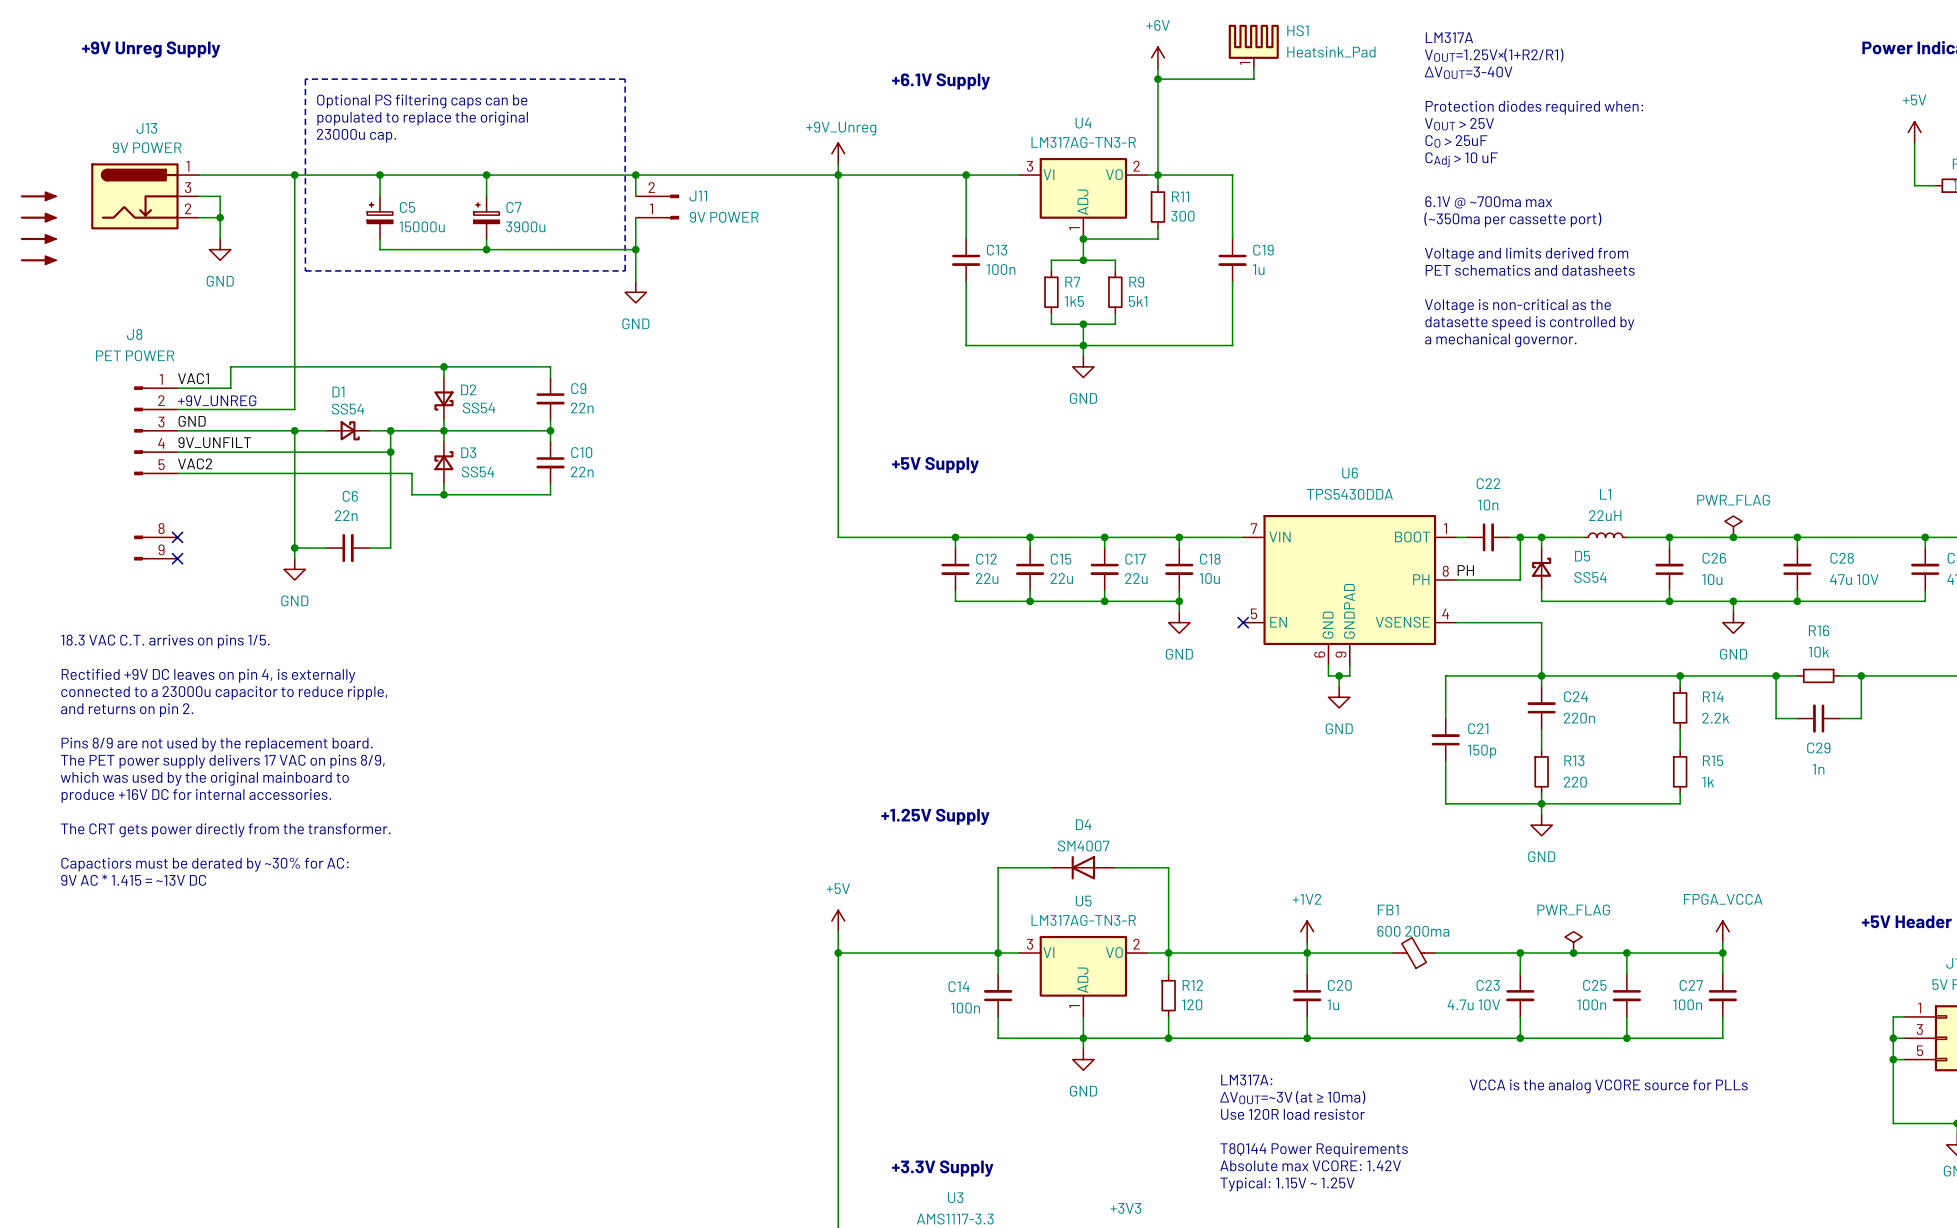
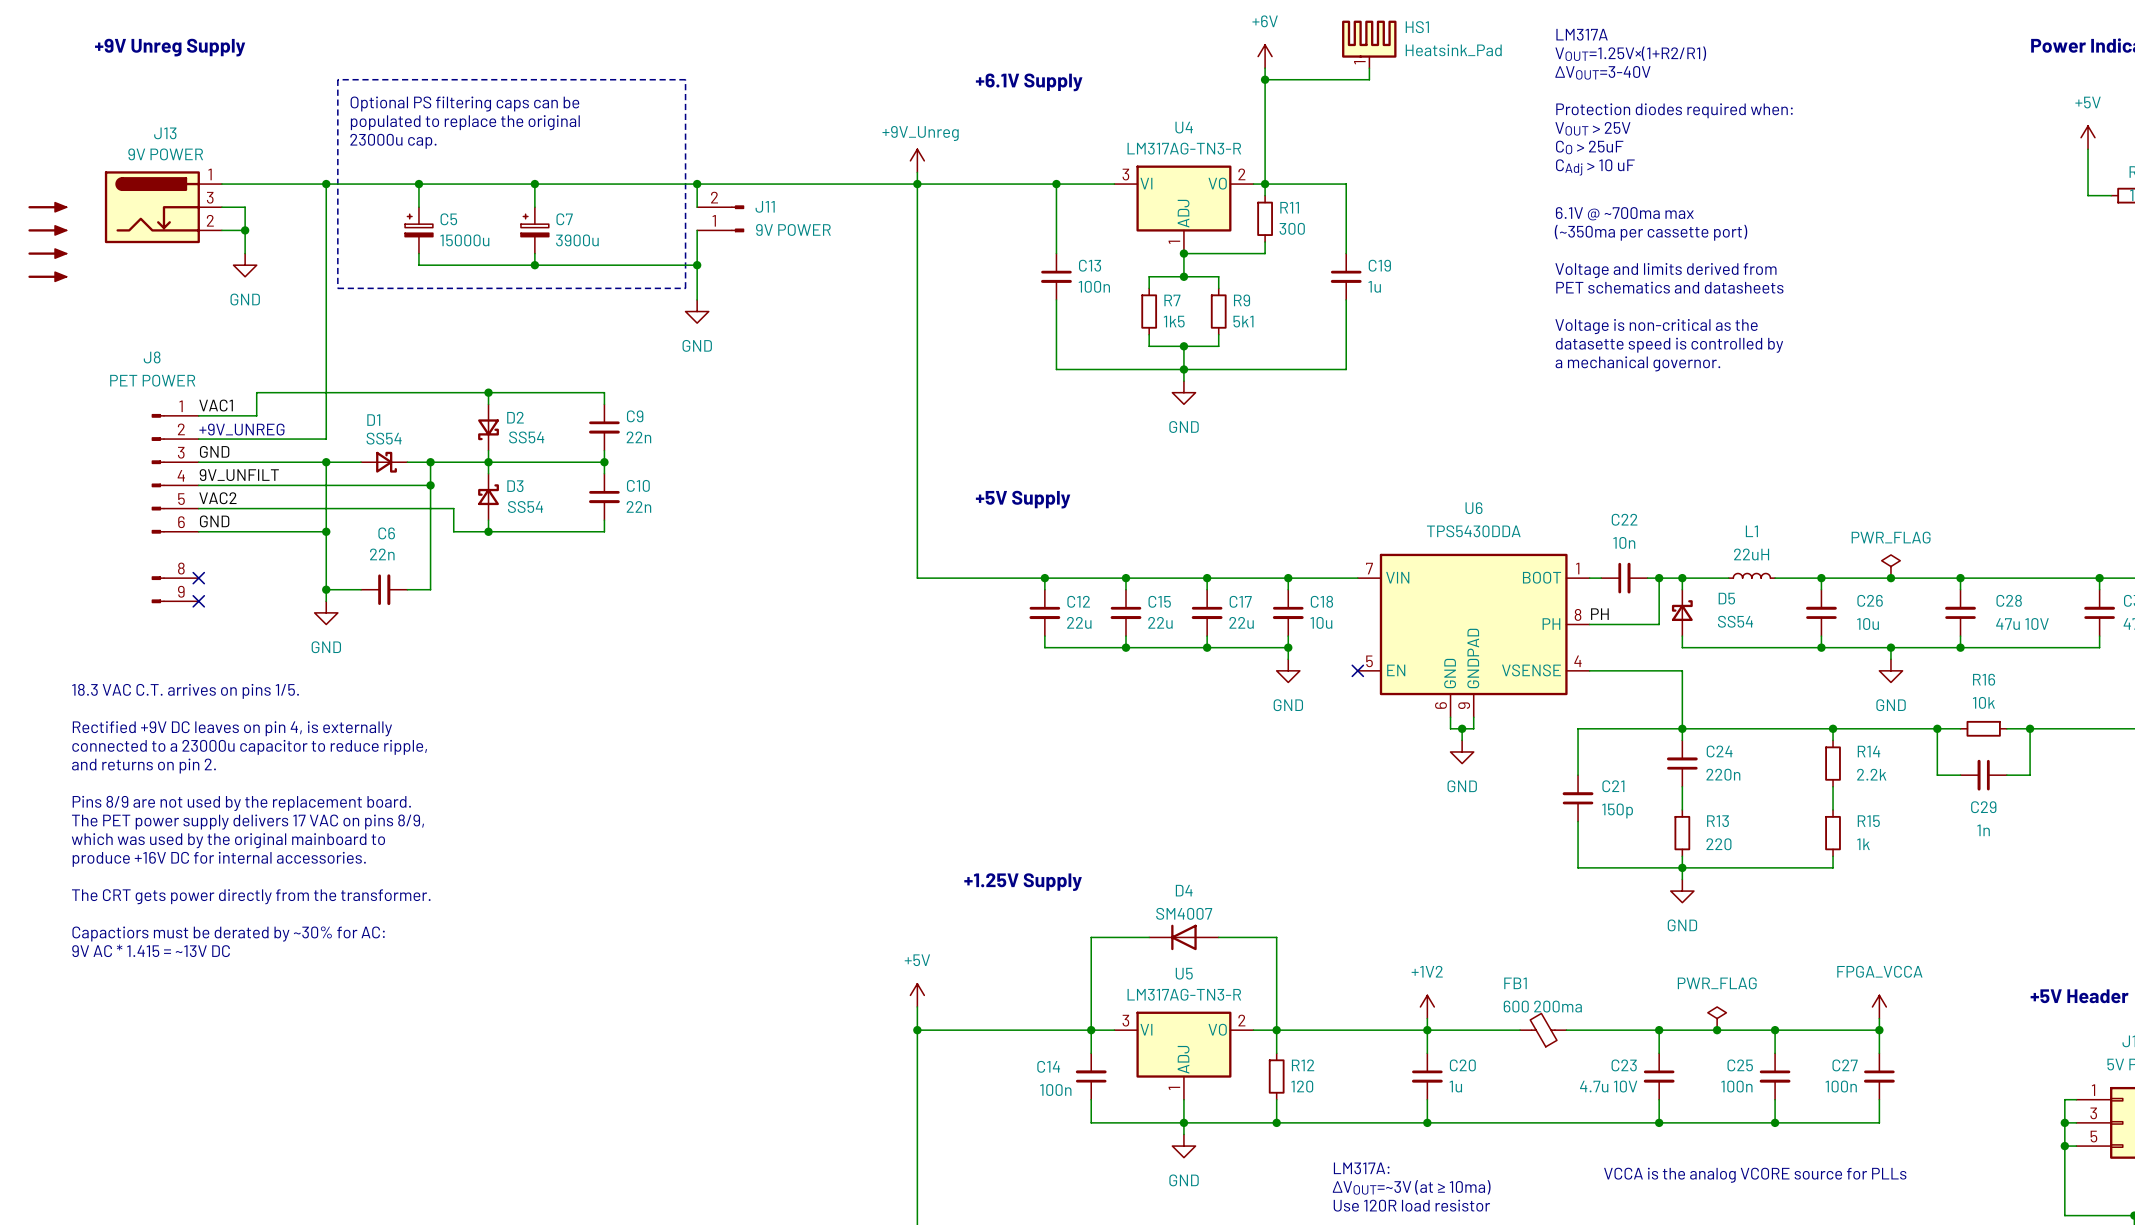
J8 symbol: [134, 386, 178, 561] -> [151, 414, 199, 604]
label: none -> GND (214, 521)
wire: none -> (198, 531) (326, 531)
junction: none -> (326, 531)

